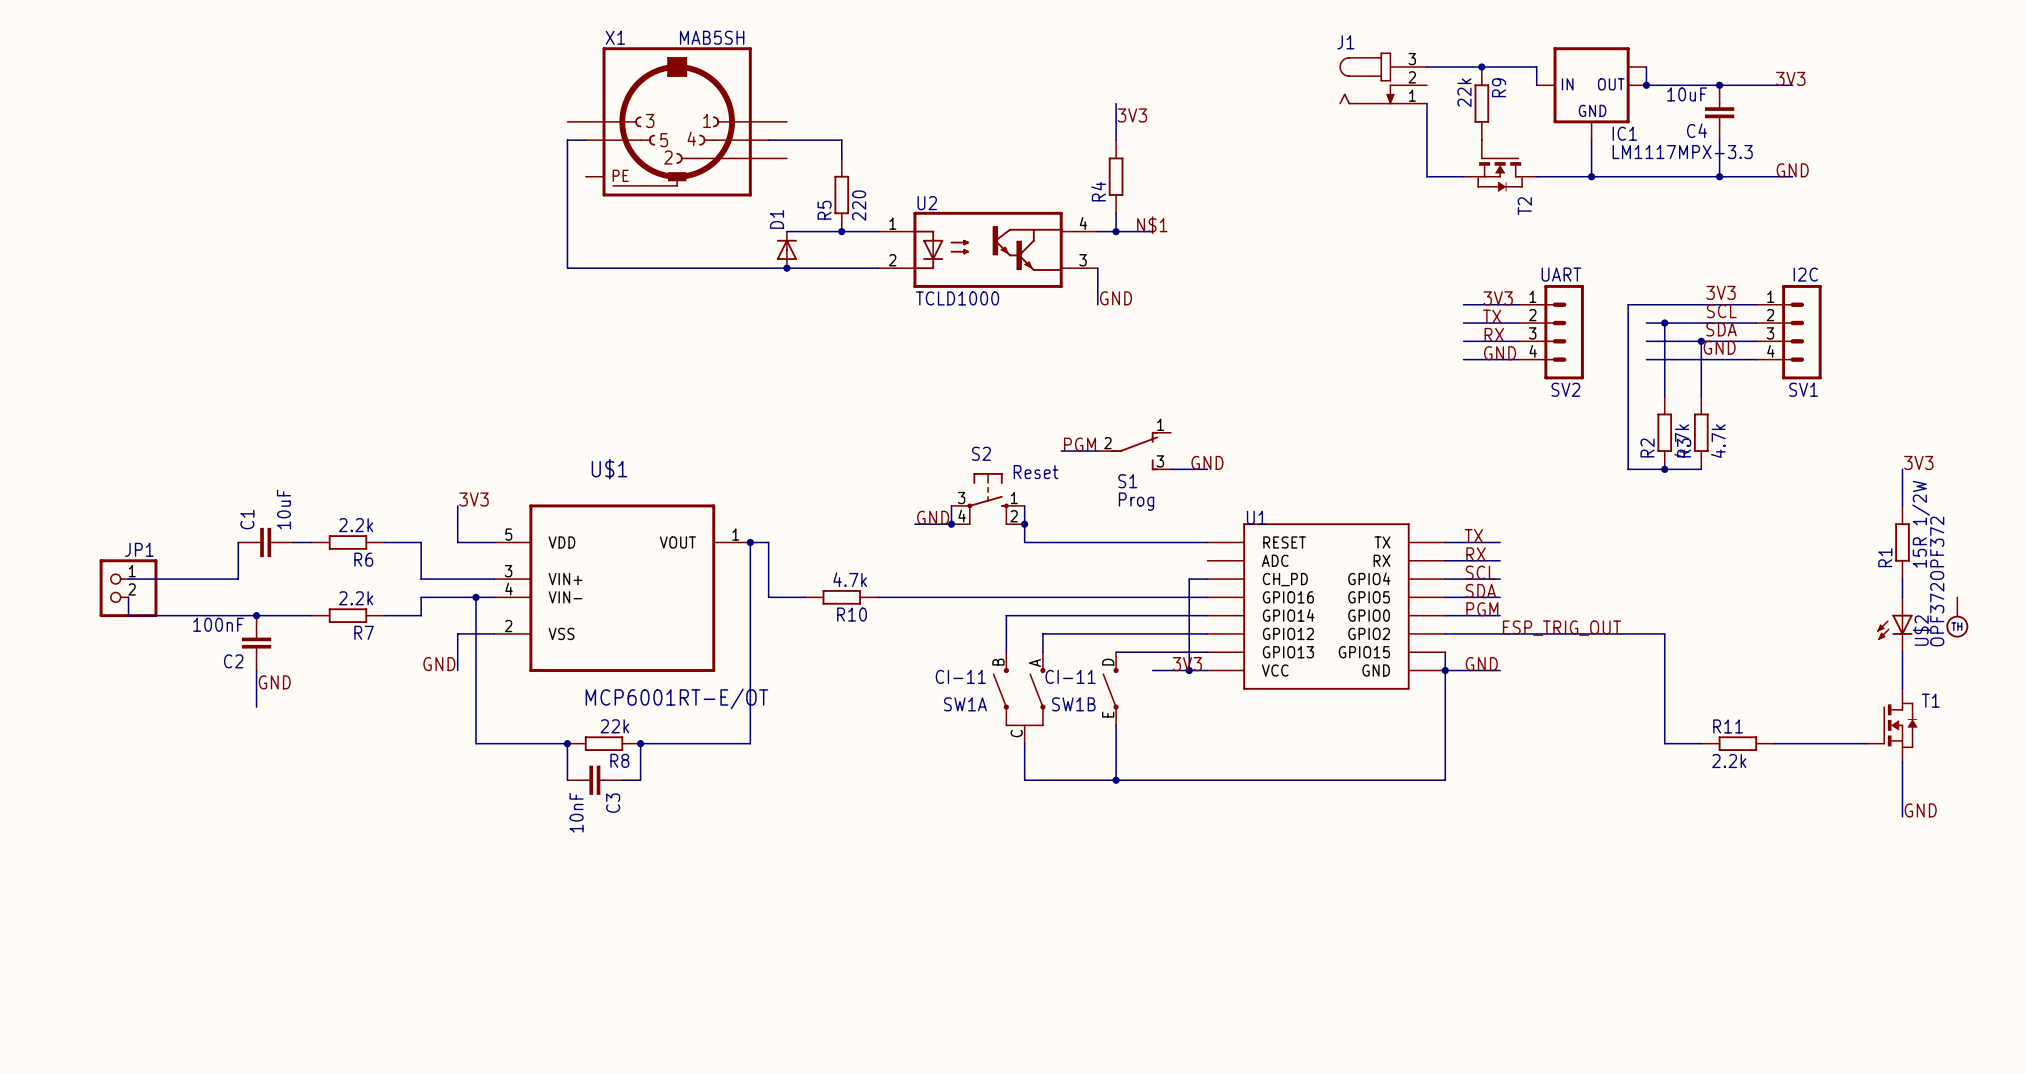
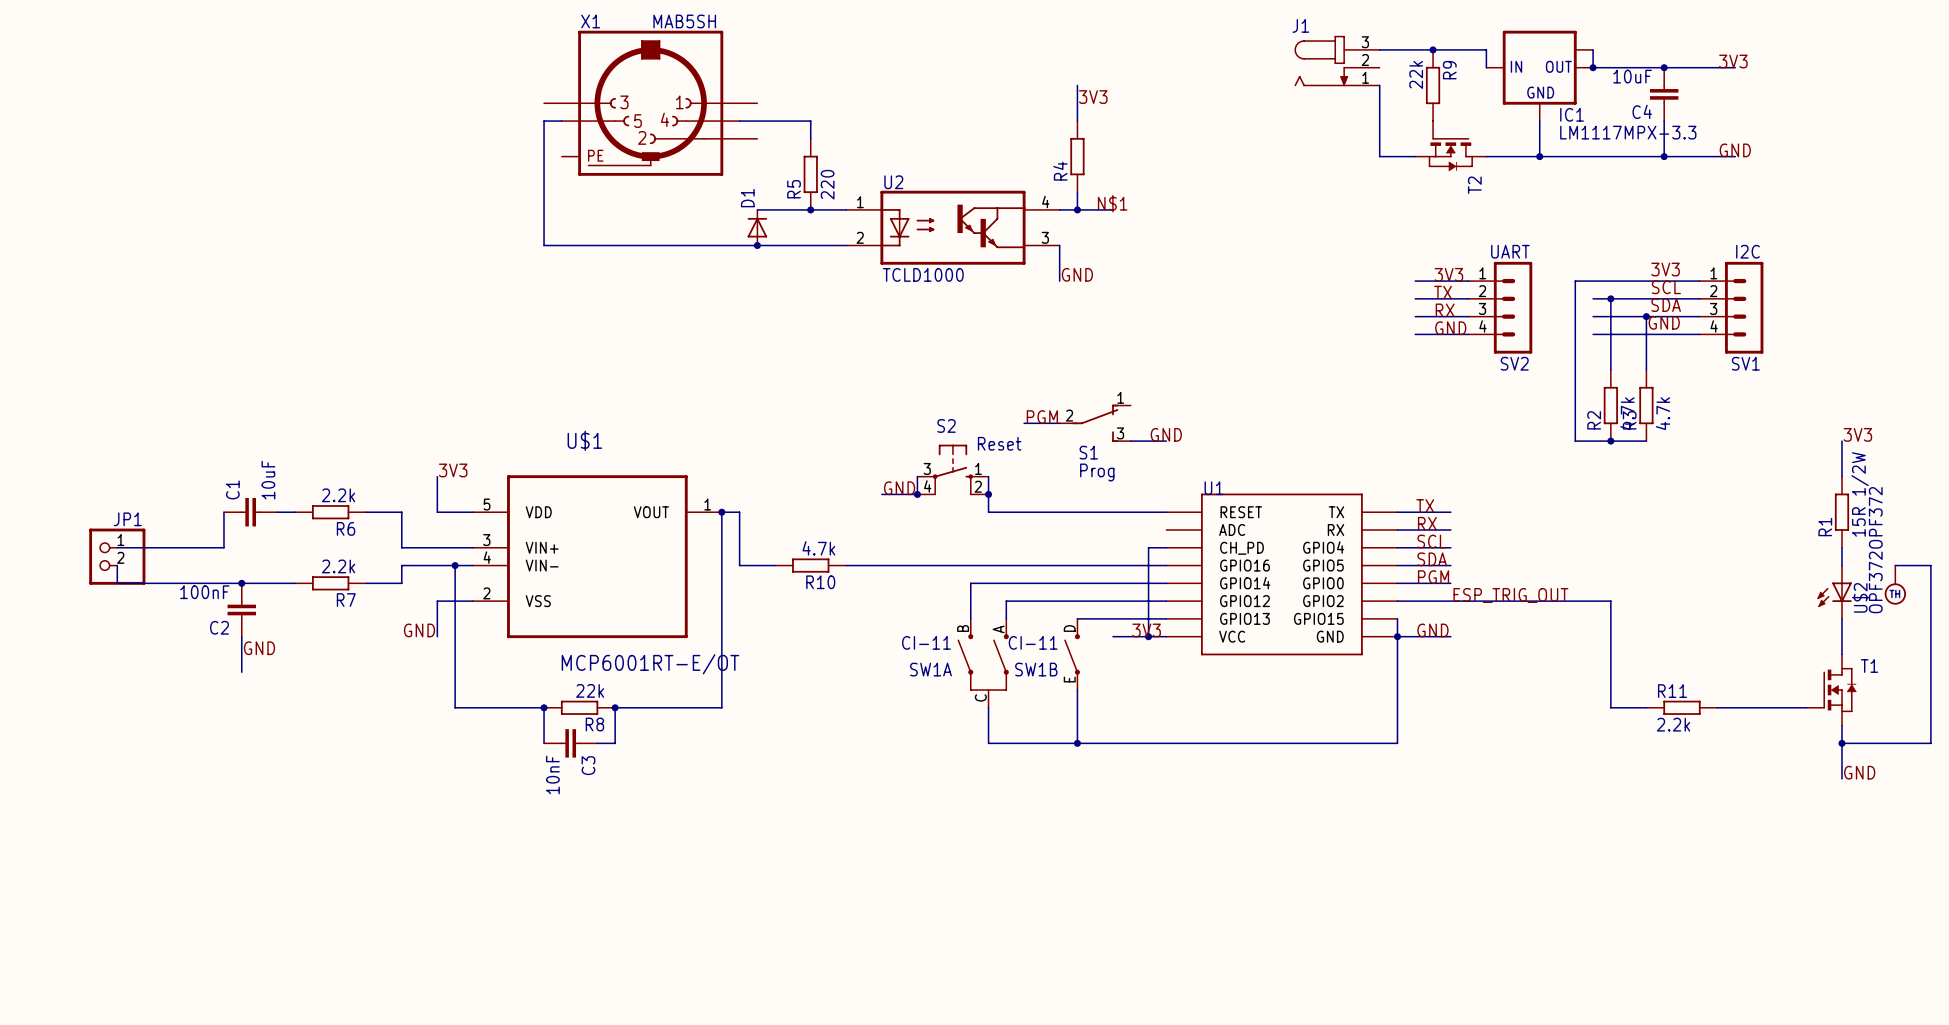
wire: none -> (1895, 565) (1930, 565) (1930, 743) (1841, 743)
junction: none -> (1841, 743)

